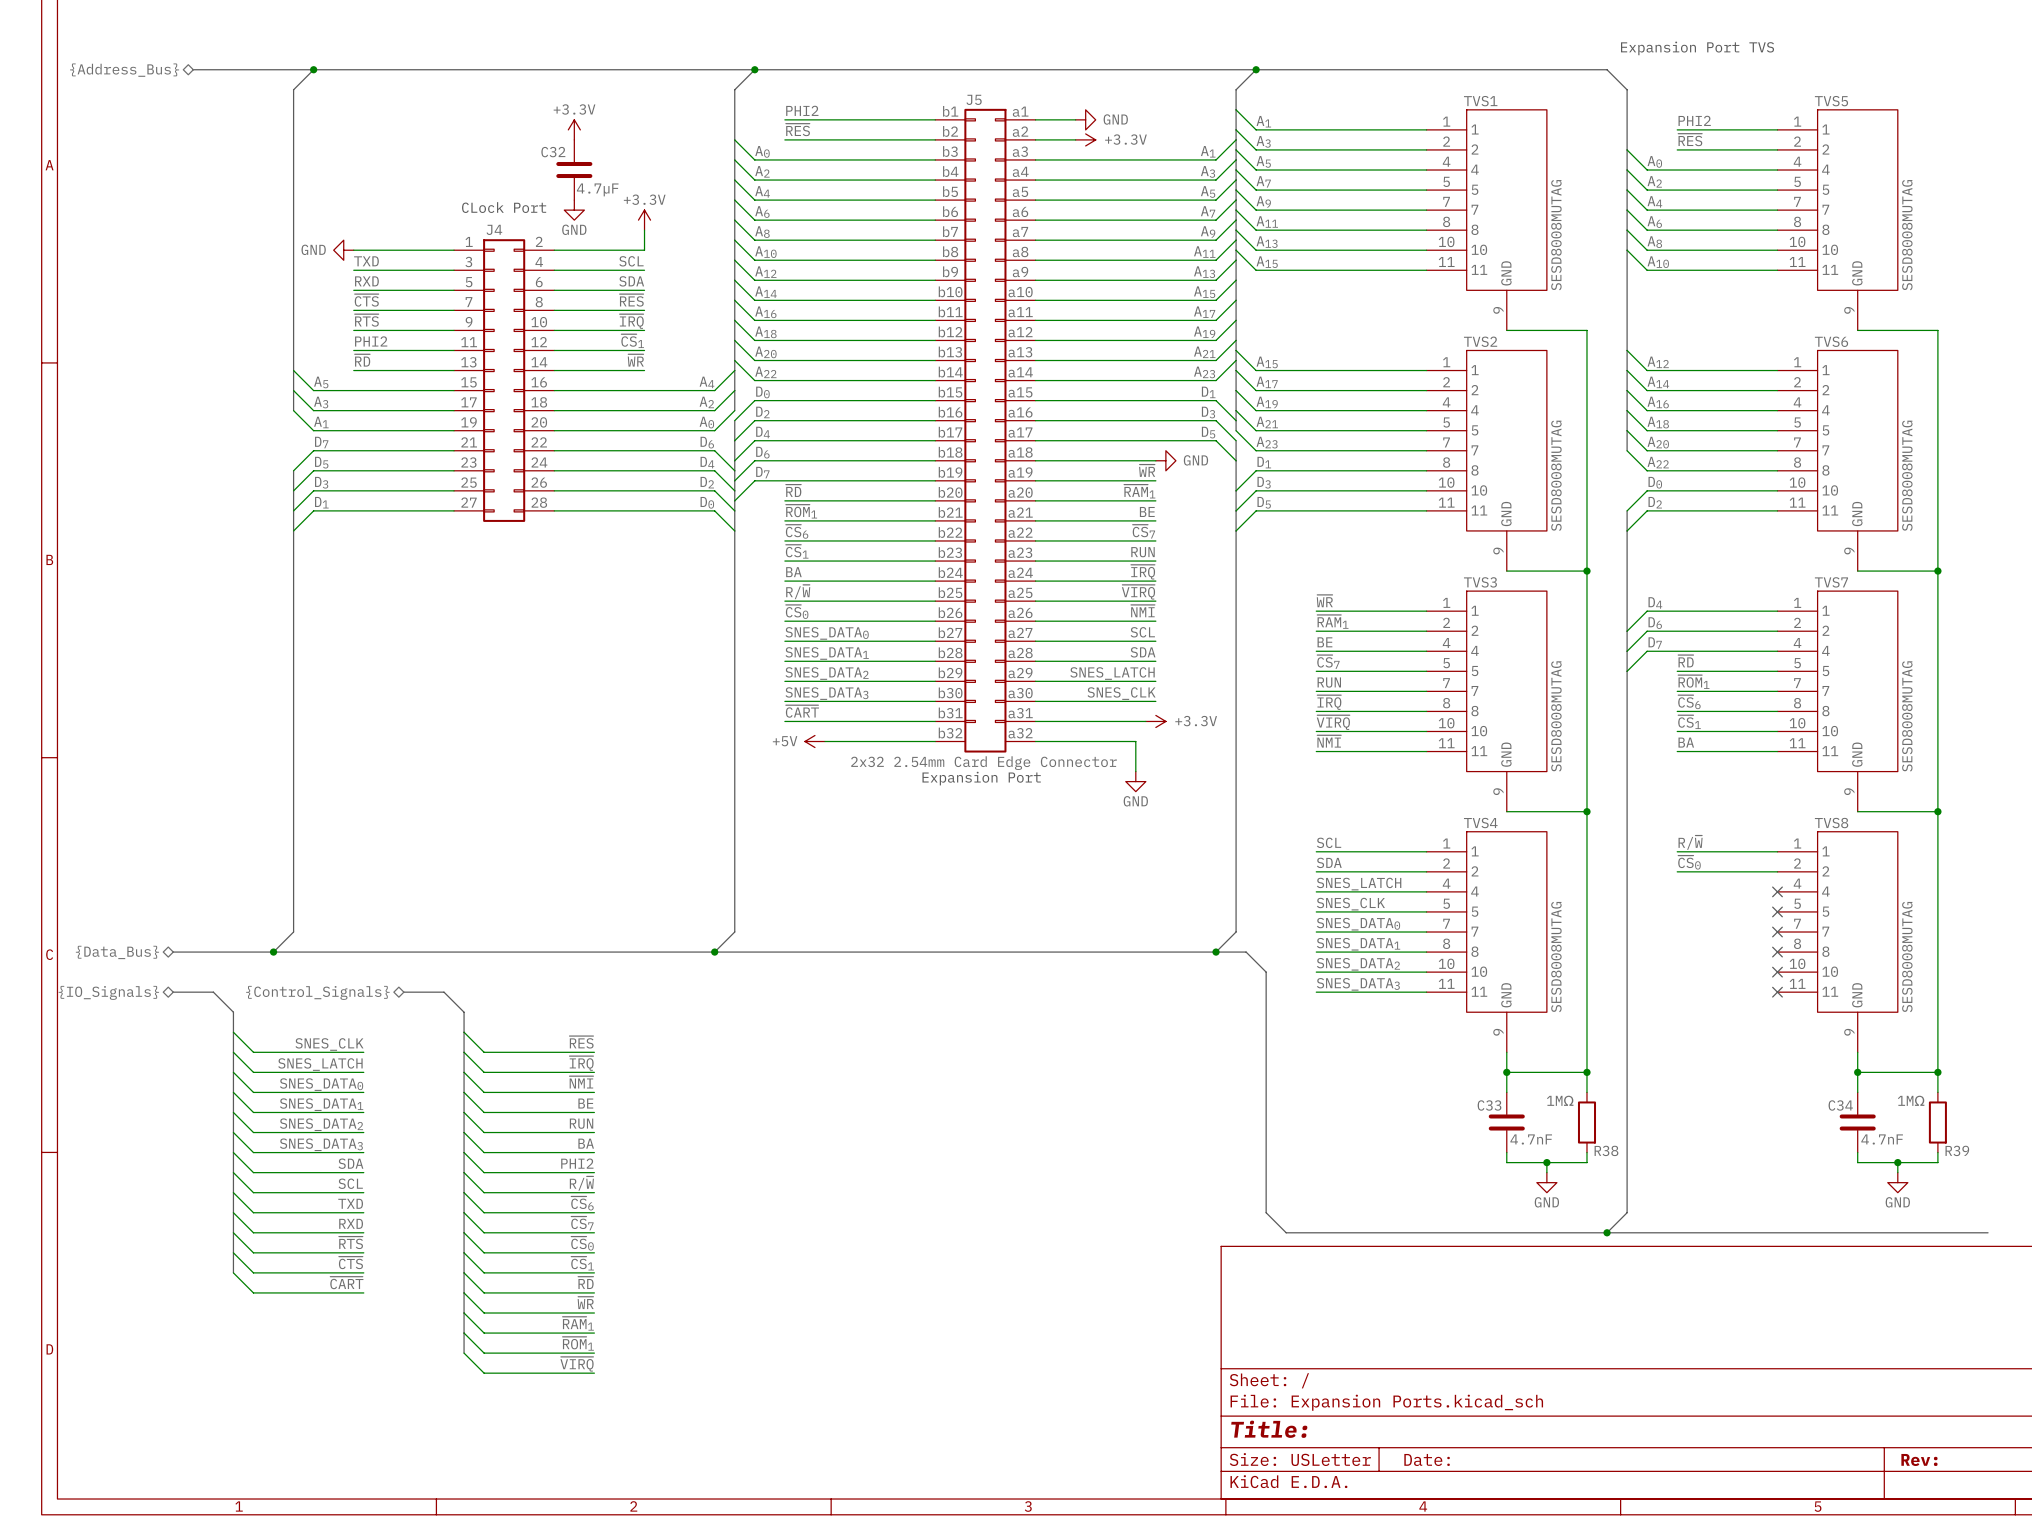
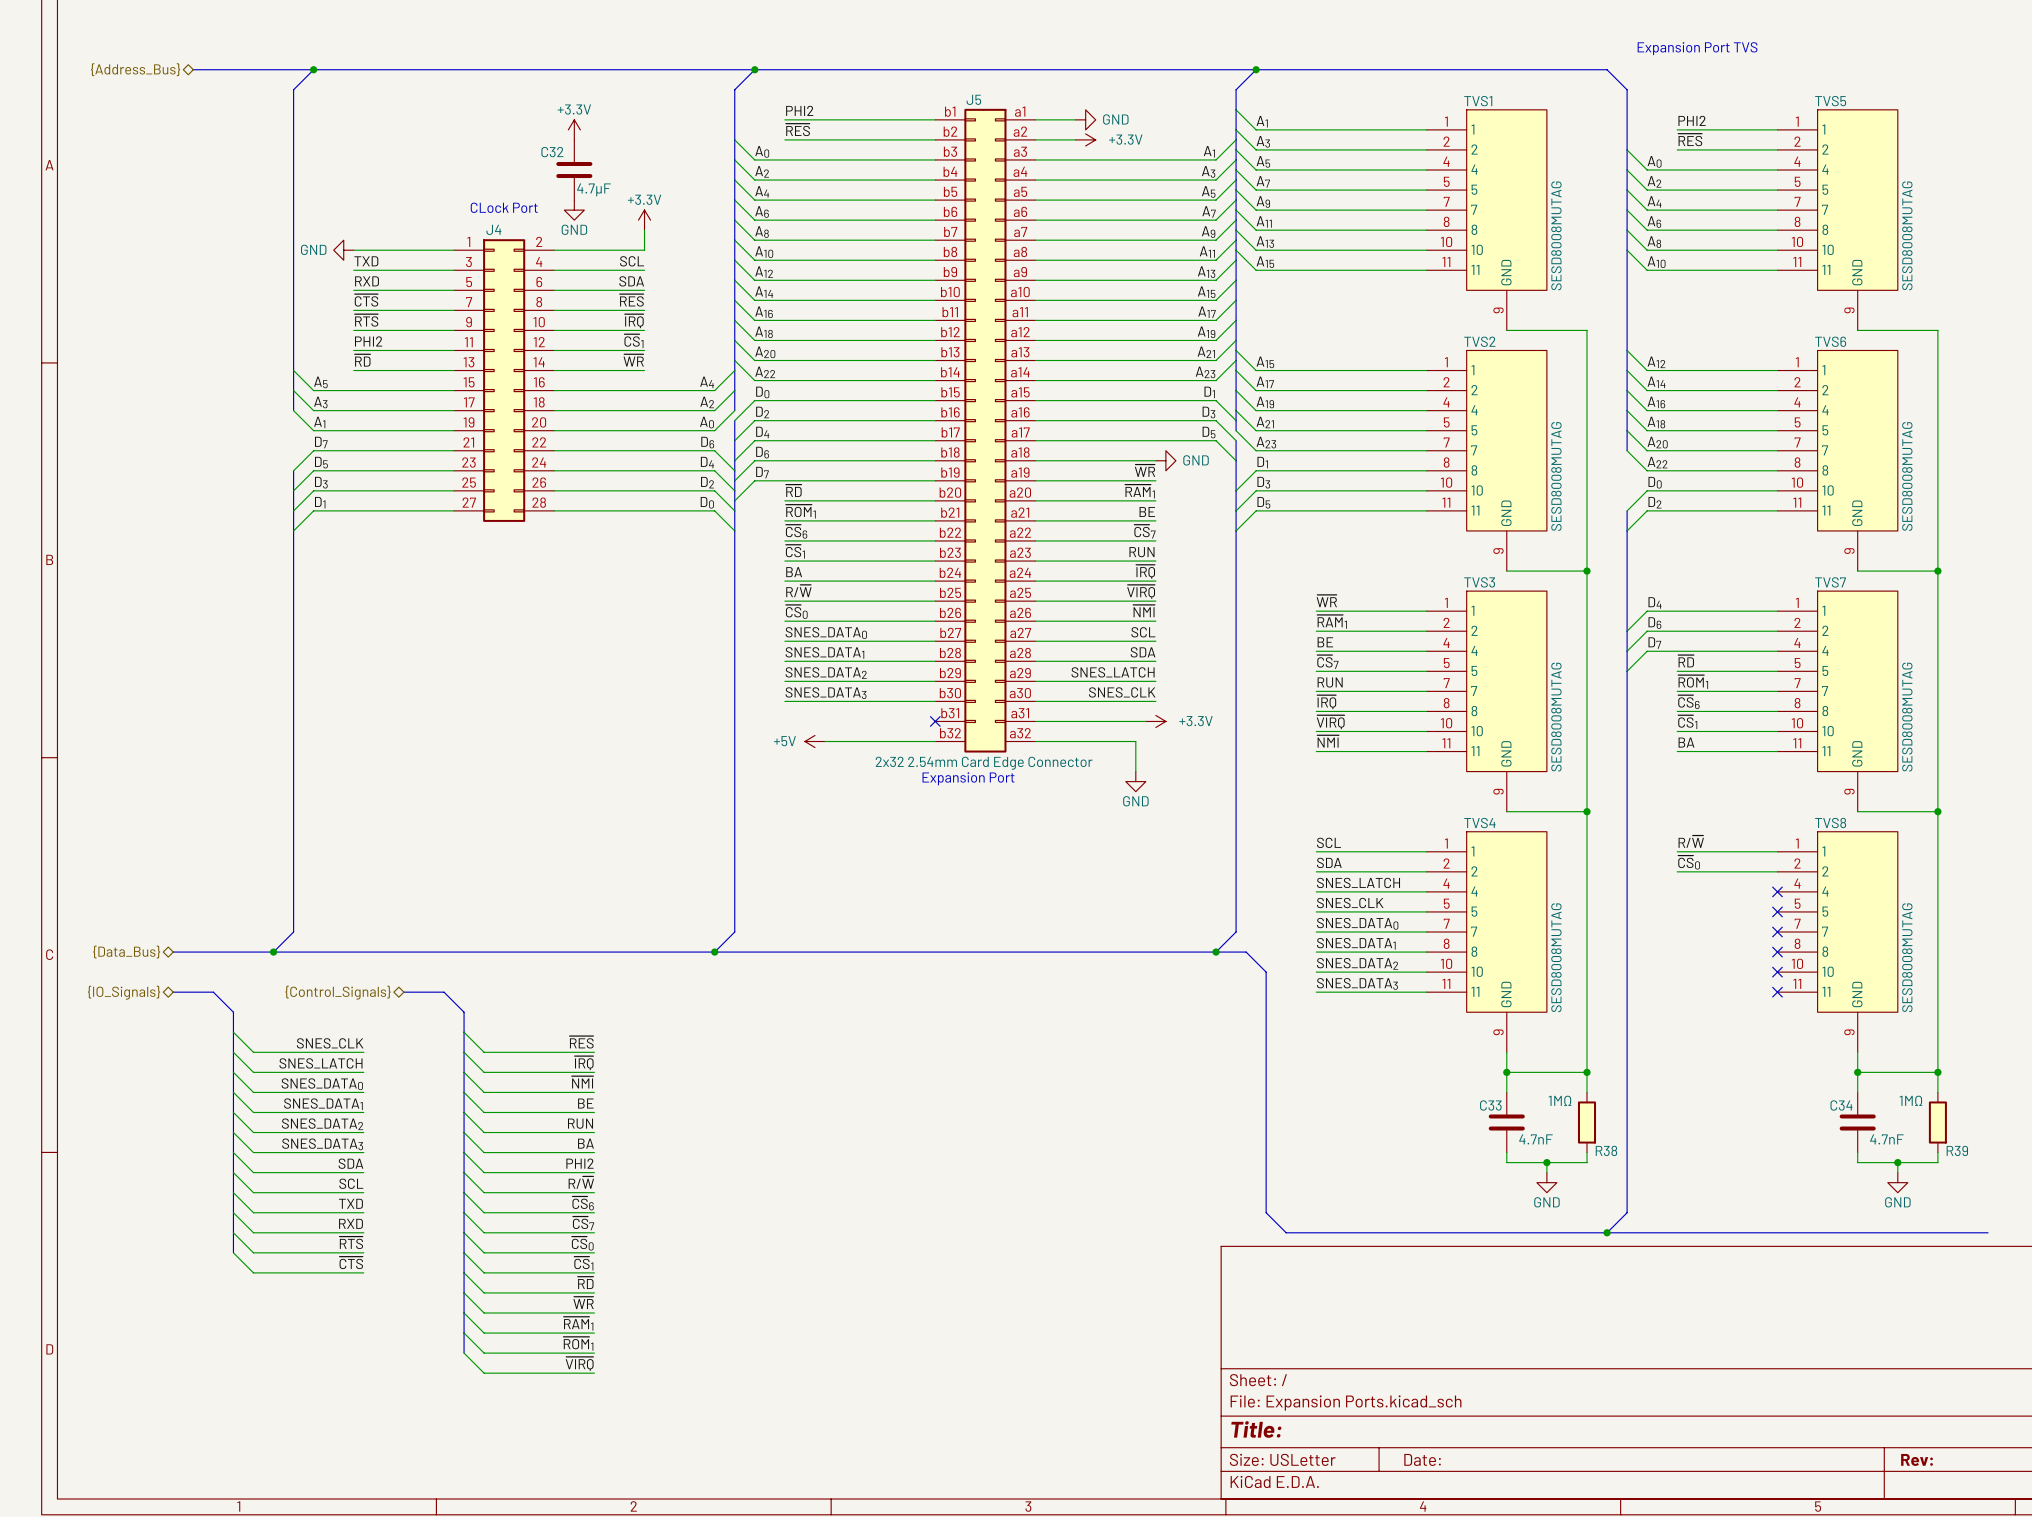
label: ~{CART} (802, 711) -> none
wire: (784, 721) (935, 721) -> none
no-connect mark: none -> (935, 721)
bus: (233, 1252) (233, 1272) -> none
wire: (233, 1272) (253, 1292) (363, 1292) -> none
label: ~{CART} (346, 1282) -> none

